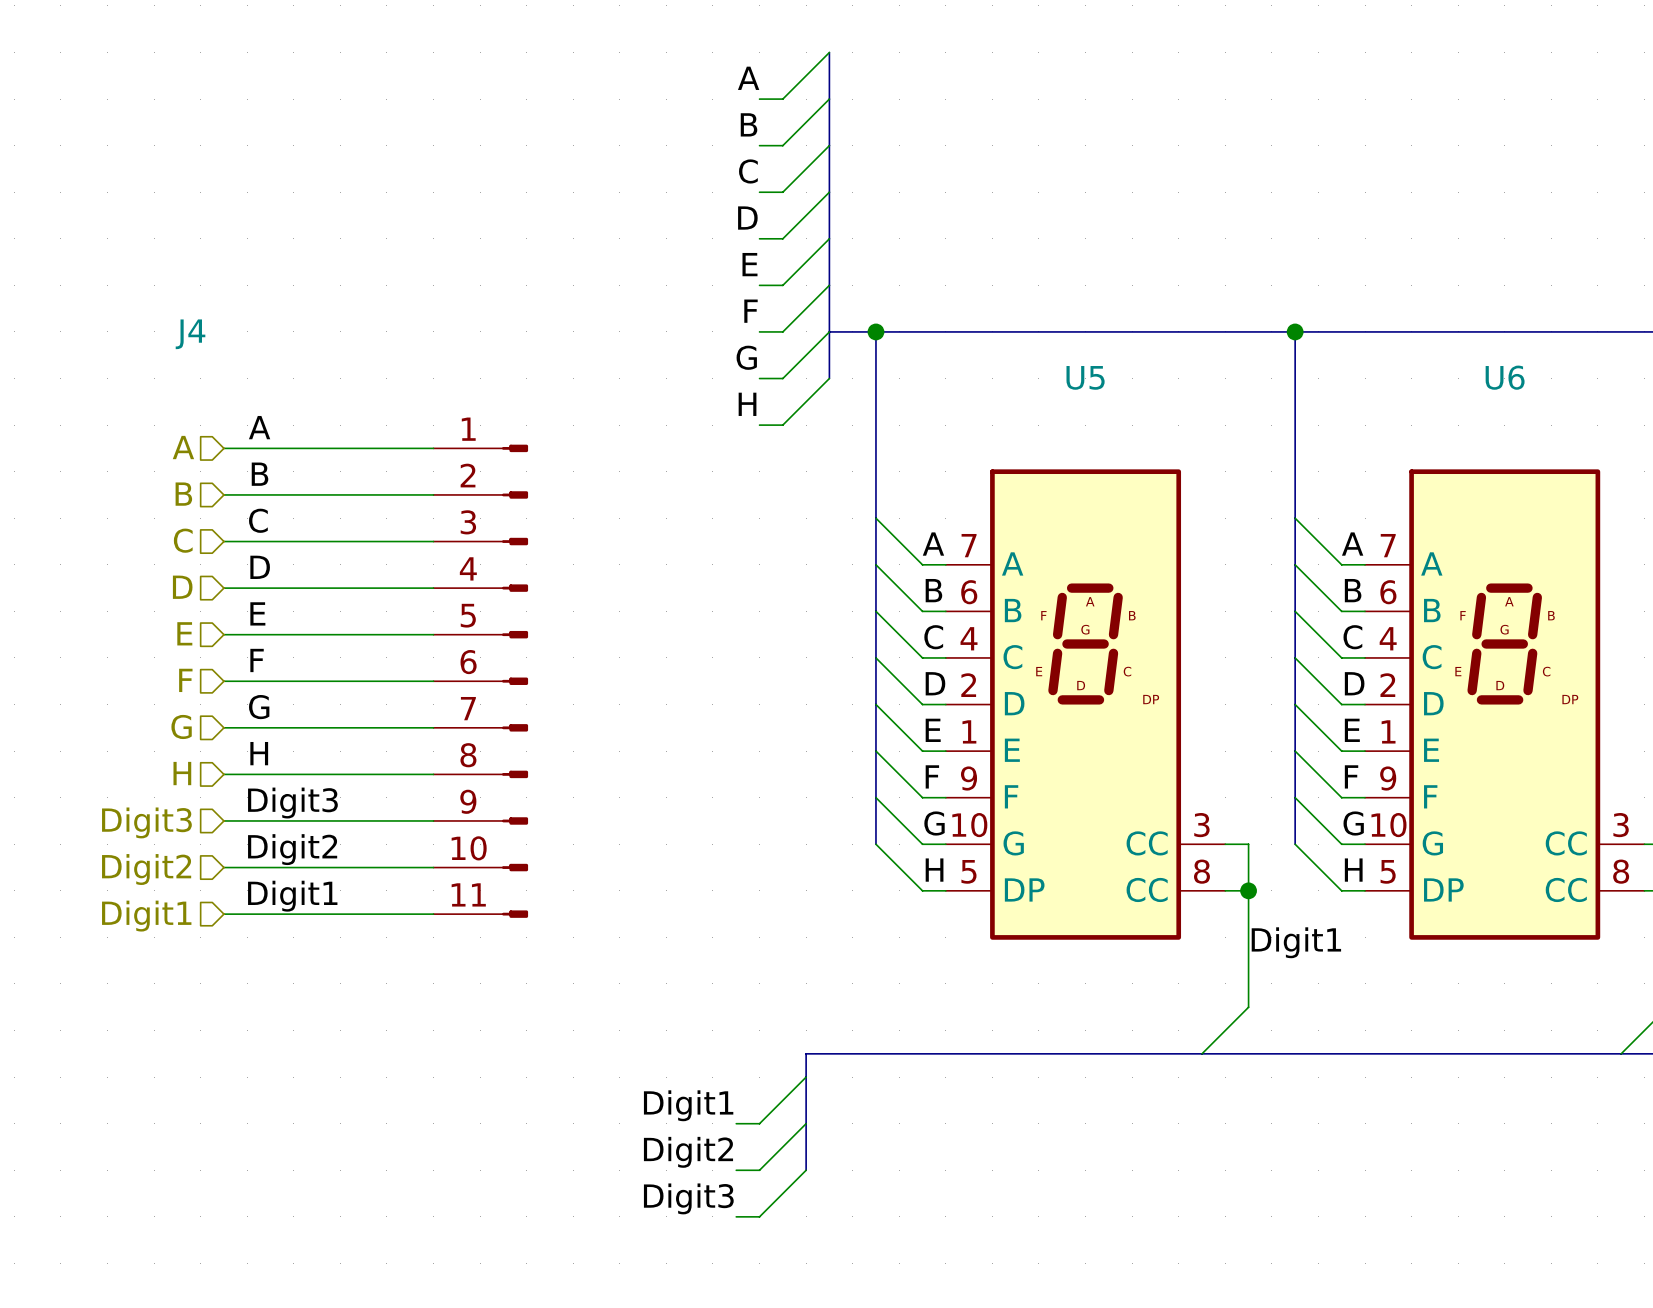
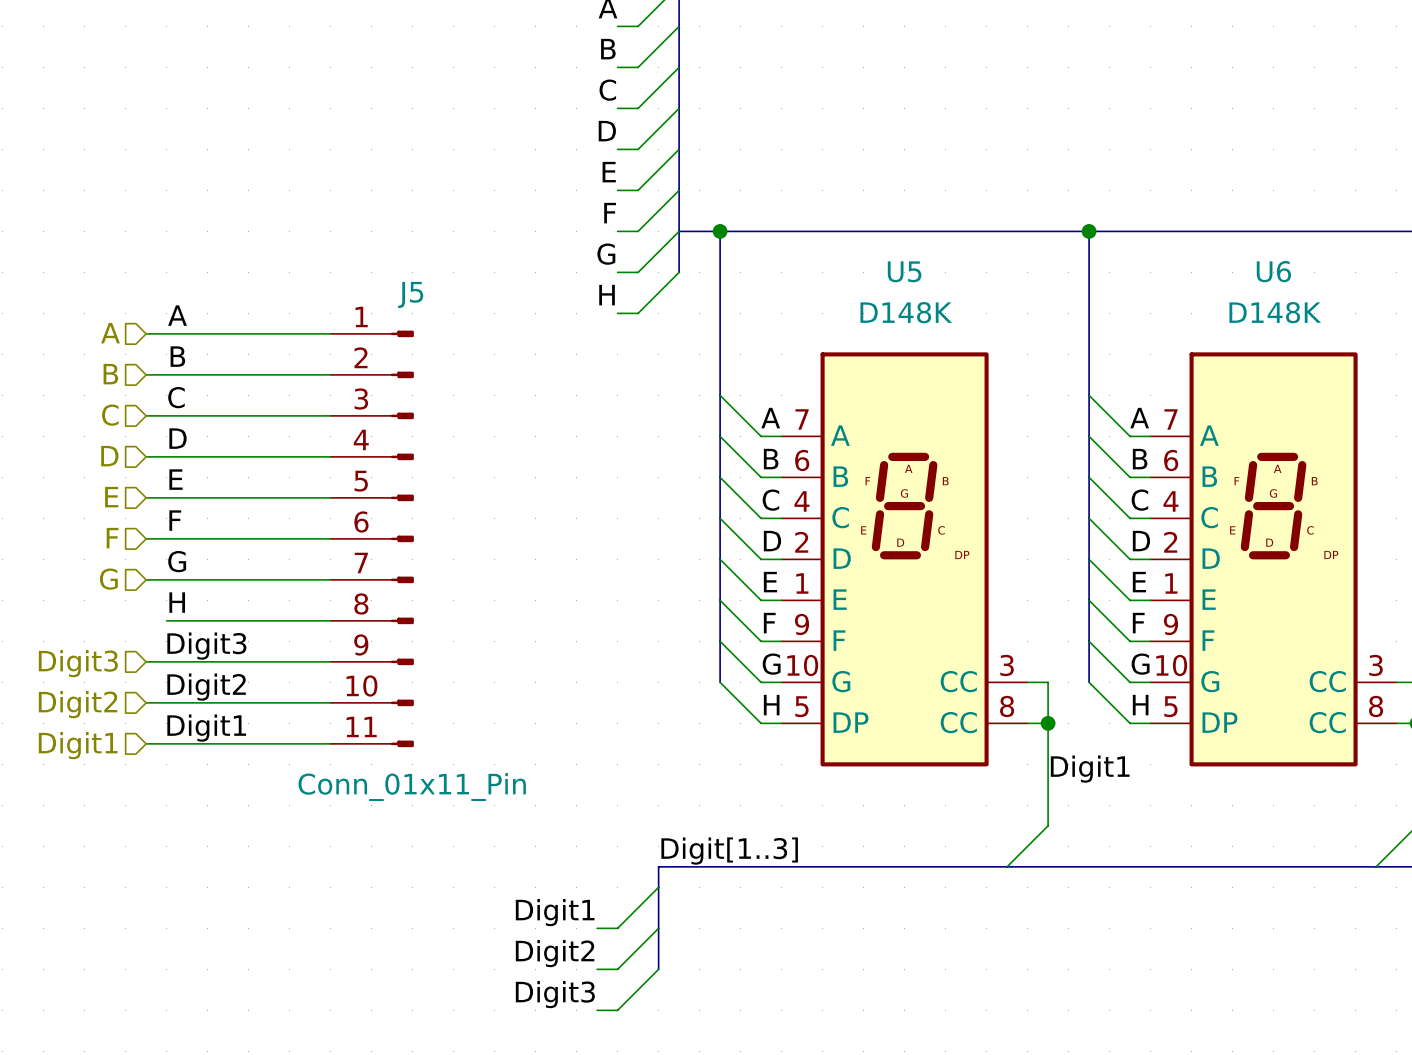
J4 name: J4 (190, 334) -> J5 (410, 294)
U5 value: none -> D148K (906, 312)
U6 value: none -> D148K (1275, 312)
hierarchical label: H (182, 773) -> none
wire: (223, 774) (247, 774) -> none
J4 value: none -> Conn_01x11_Pin (412, 786)
label: none -> Digit[1..3] (729, 851)

